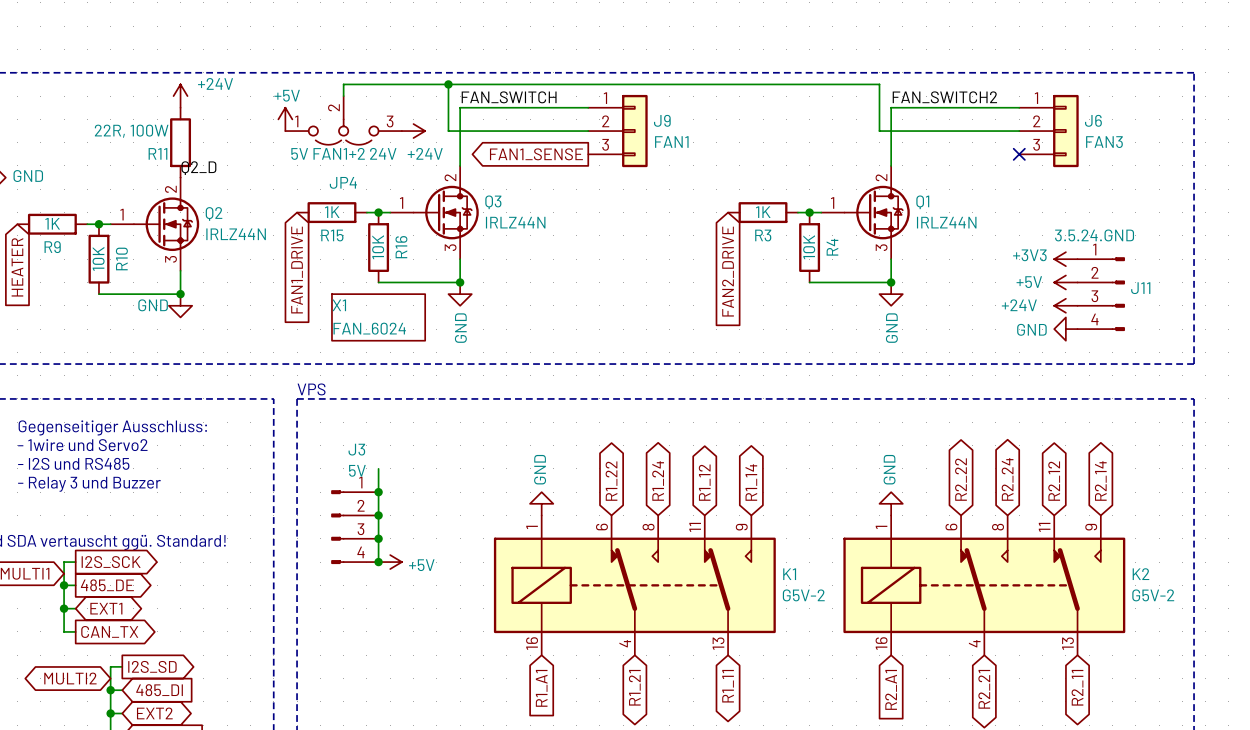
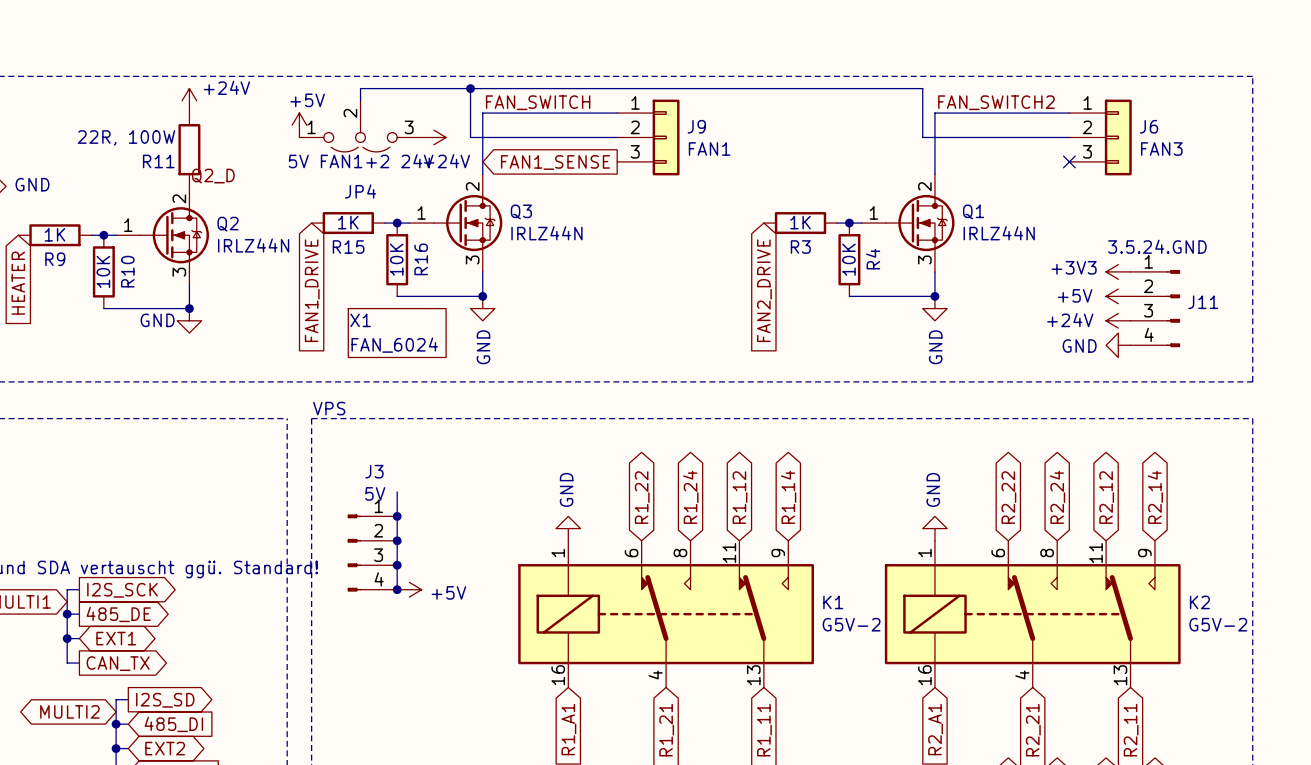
text: Gegenseitiger Ausschluss: (112, 427) -> none
text: - 1wire und Servo2 (82, 445) -> none
text: - I2S und RS485 (73, 463) -> none
text: - Relay 3 und Buzzer (89, 484) -> none

